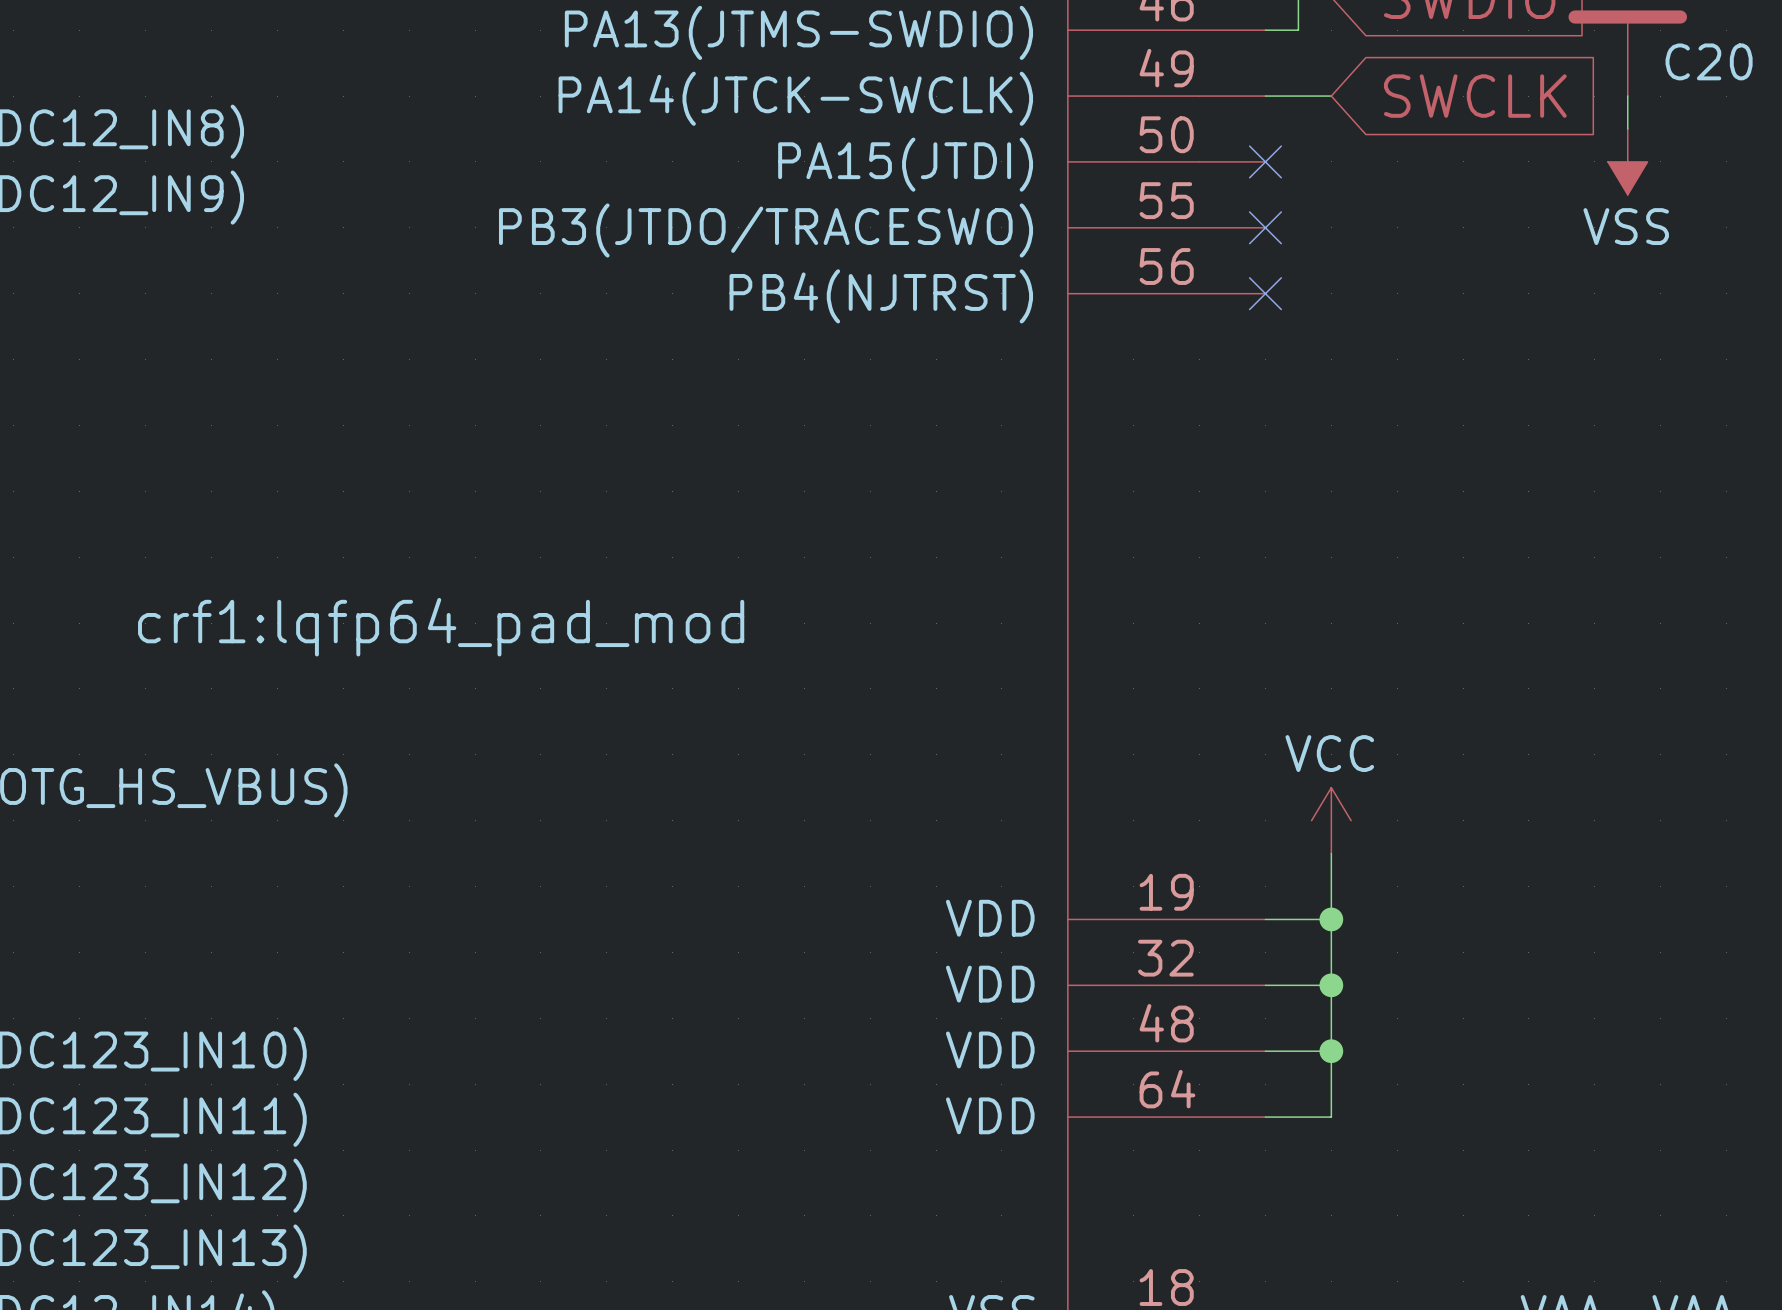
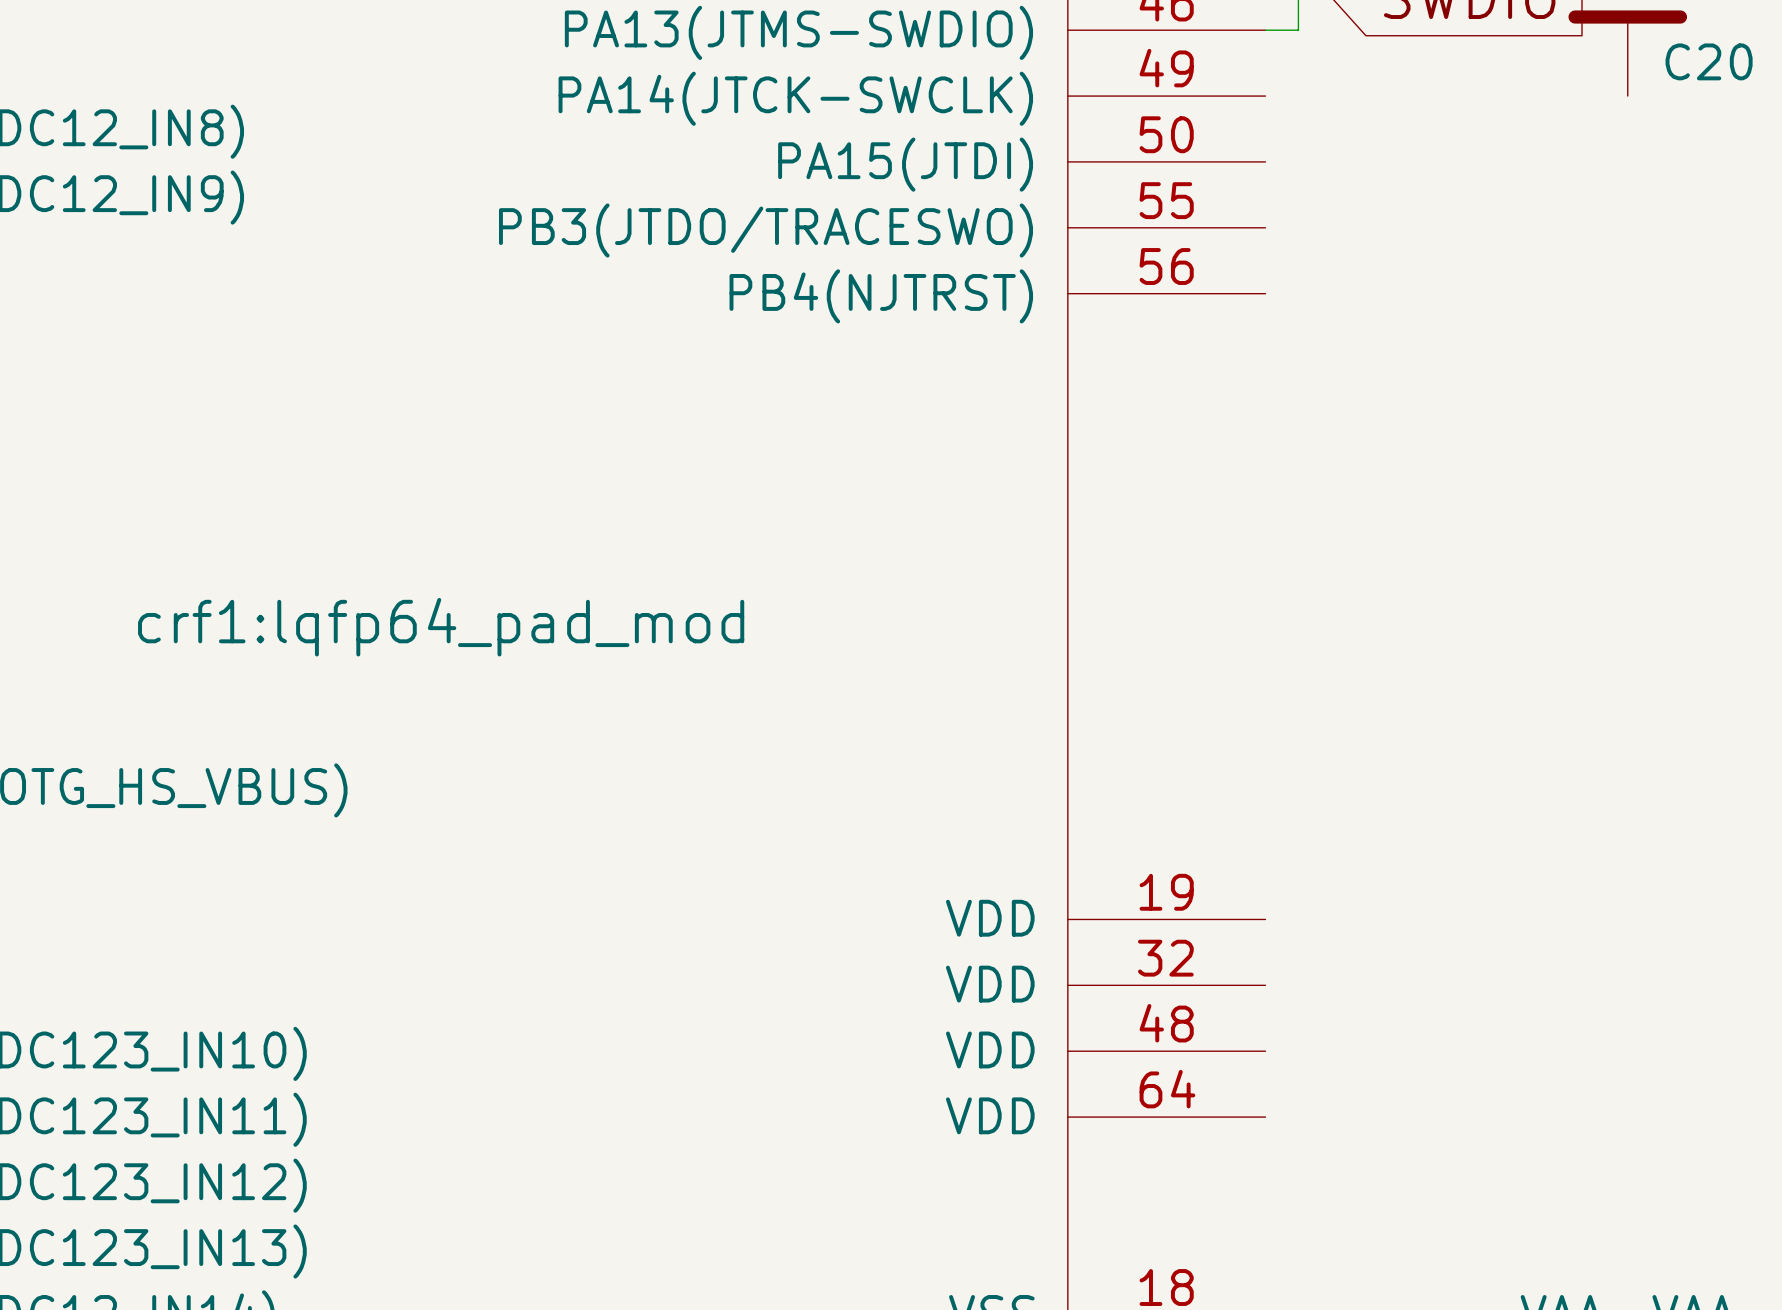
wire: (1265, 96) (1331, 96) -> none
global label: SWCLK (1475, 96) -> none
wire: (1627, 96) (1627, 129) -> none
no-connect mark: (1265, 161) -> none
power symbol: VSS (1627, 161) -> none
no-connect mark: (1265, 227) -> none
no-connect mark: (1265, 293) -> none
power symbol: VCC (1331, 820) -> none
wire: (1331, 853) (1331, 1117) (1265, 1117) -> none
wire: (1265, 919) (1331, 919) -> none
junction: (1331, 919) -> none
wire: (1265, 985) (1331, 985) -> none
junction: (1331, 985) -> none
wire: (1265, 1051) (1331, 1051) -> none
junction: (1331, 1051) -> none

